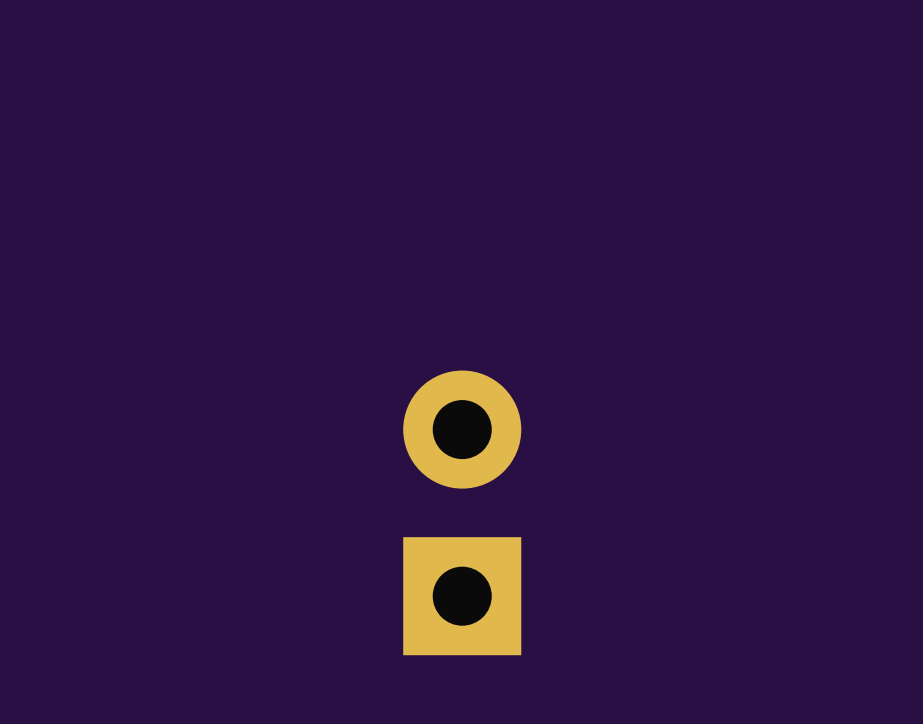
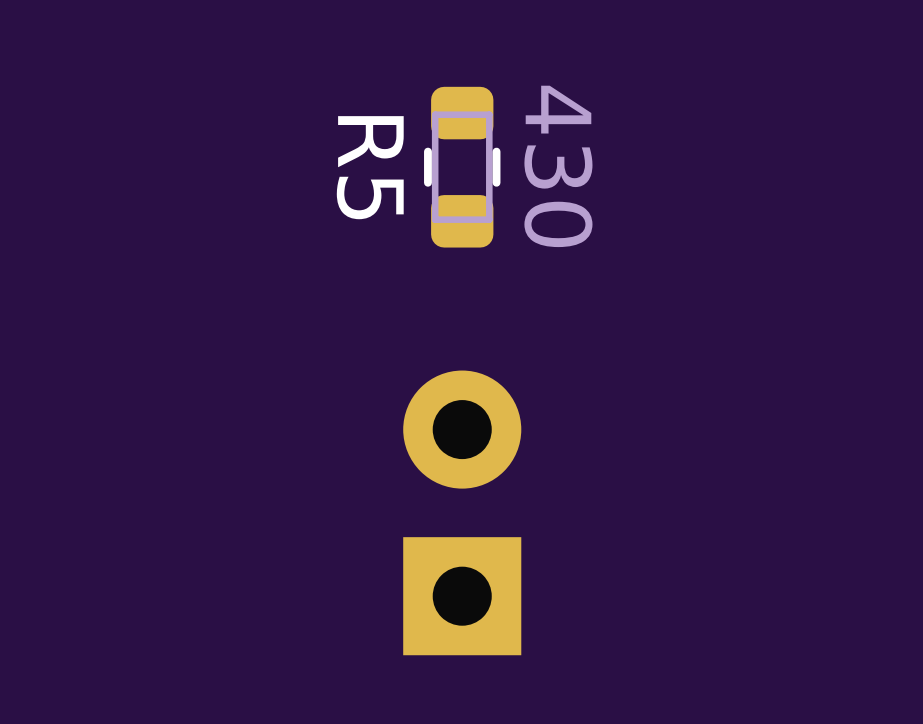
R5: none -> 430 (462, 167)

